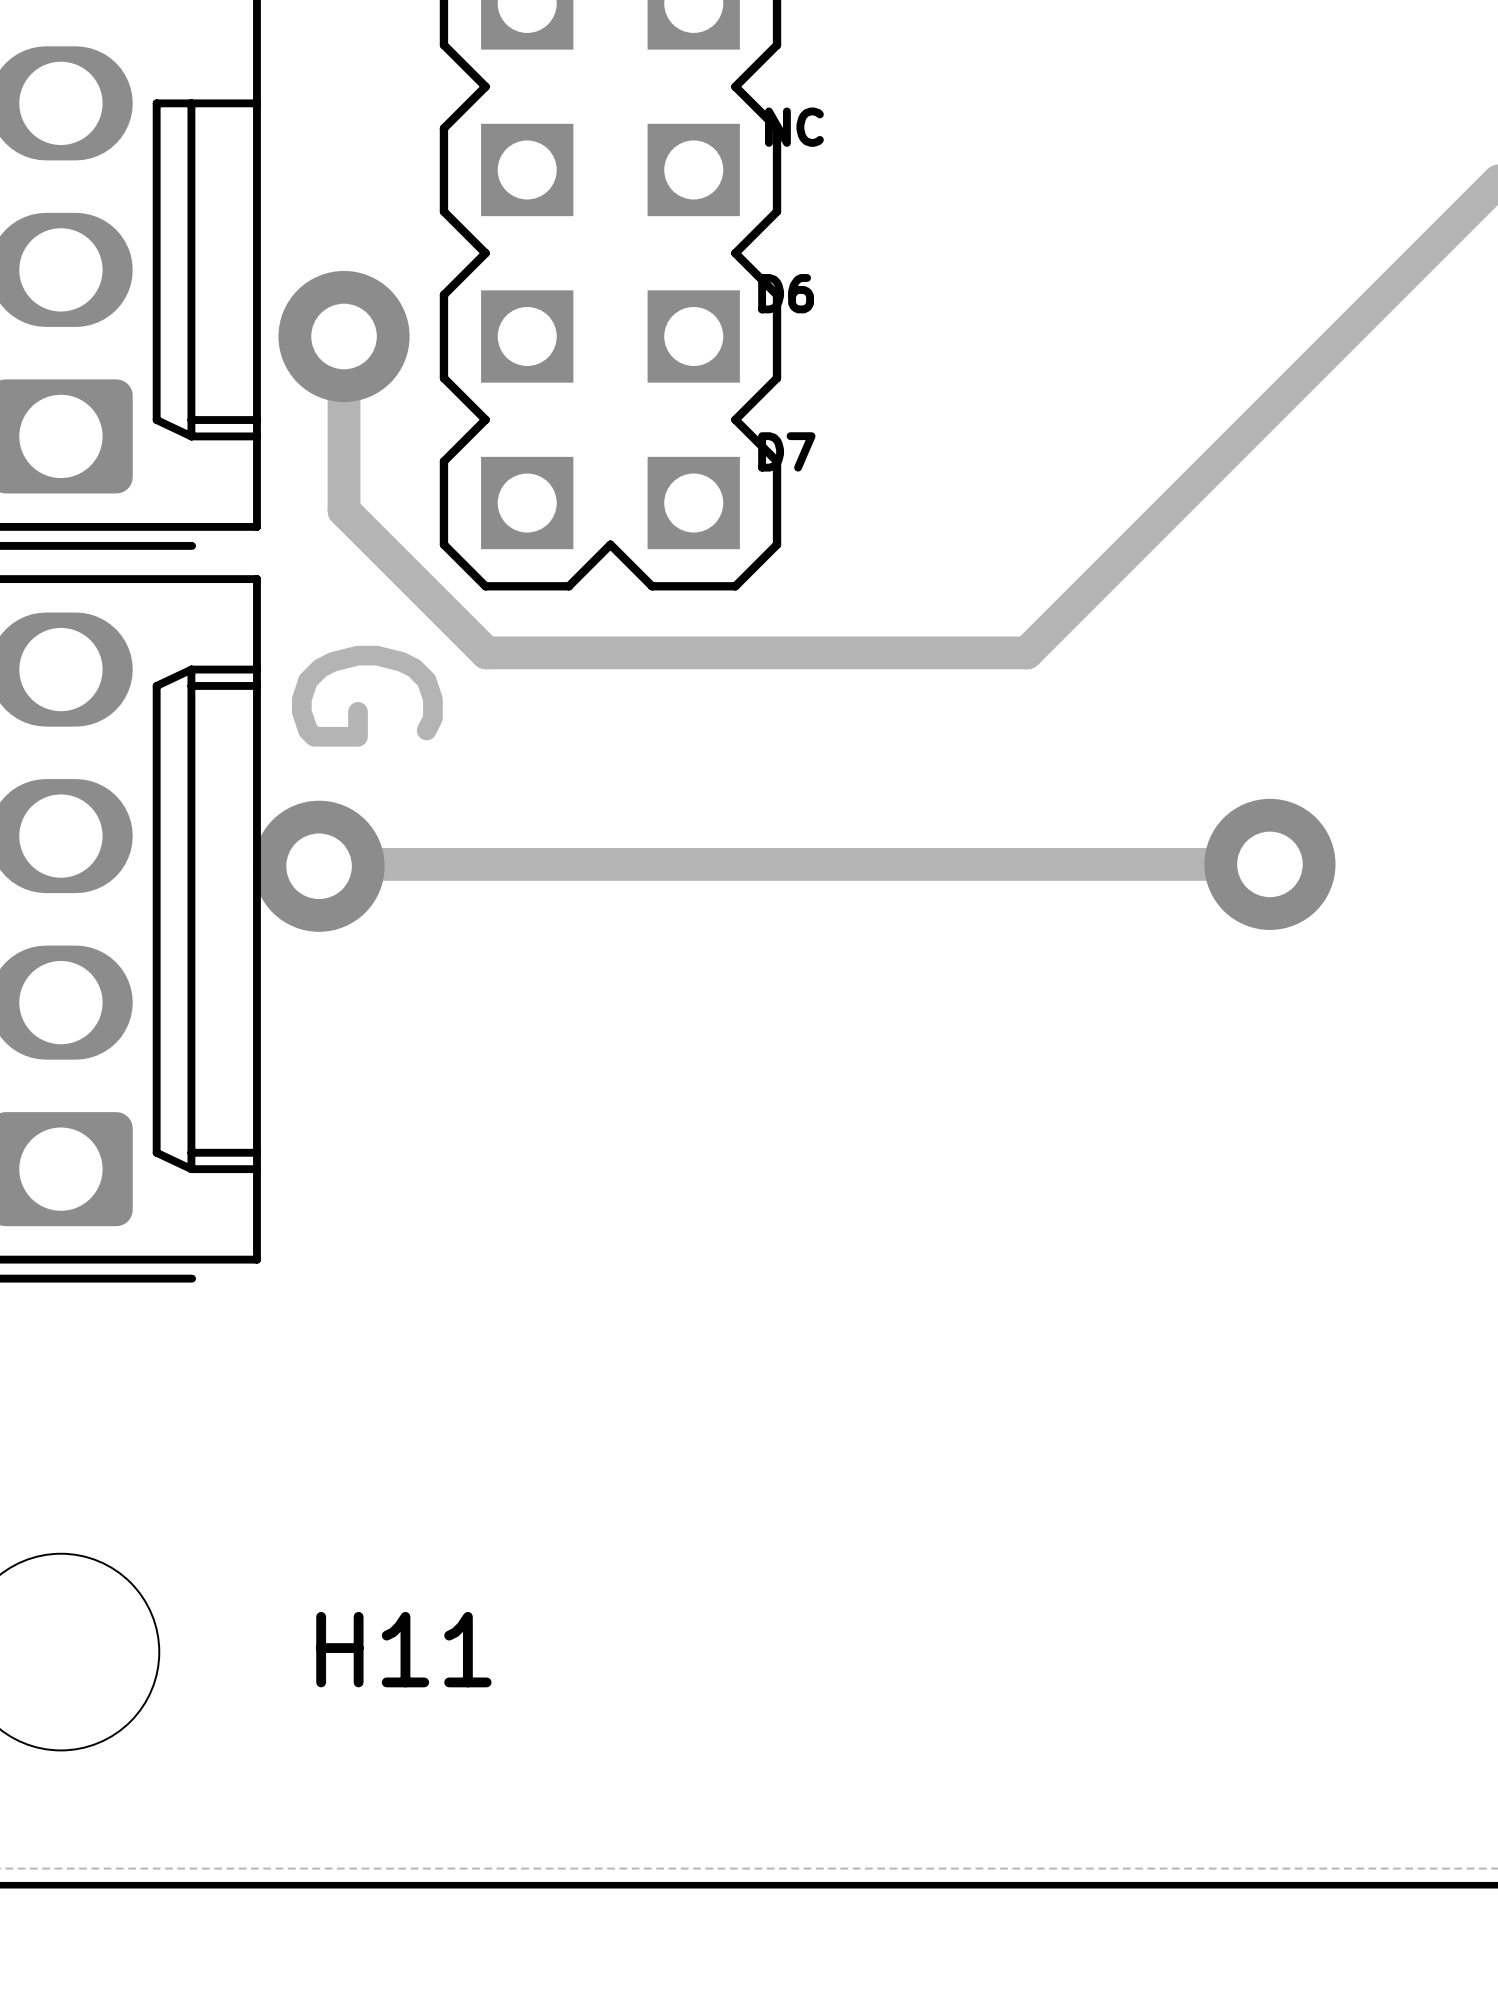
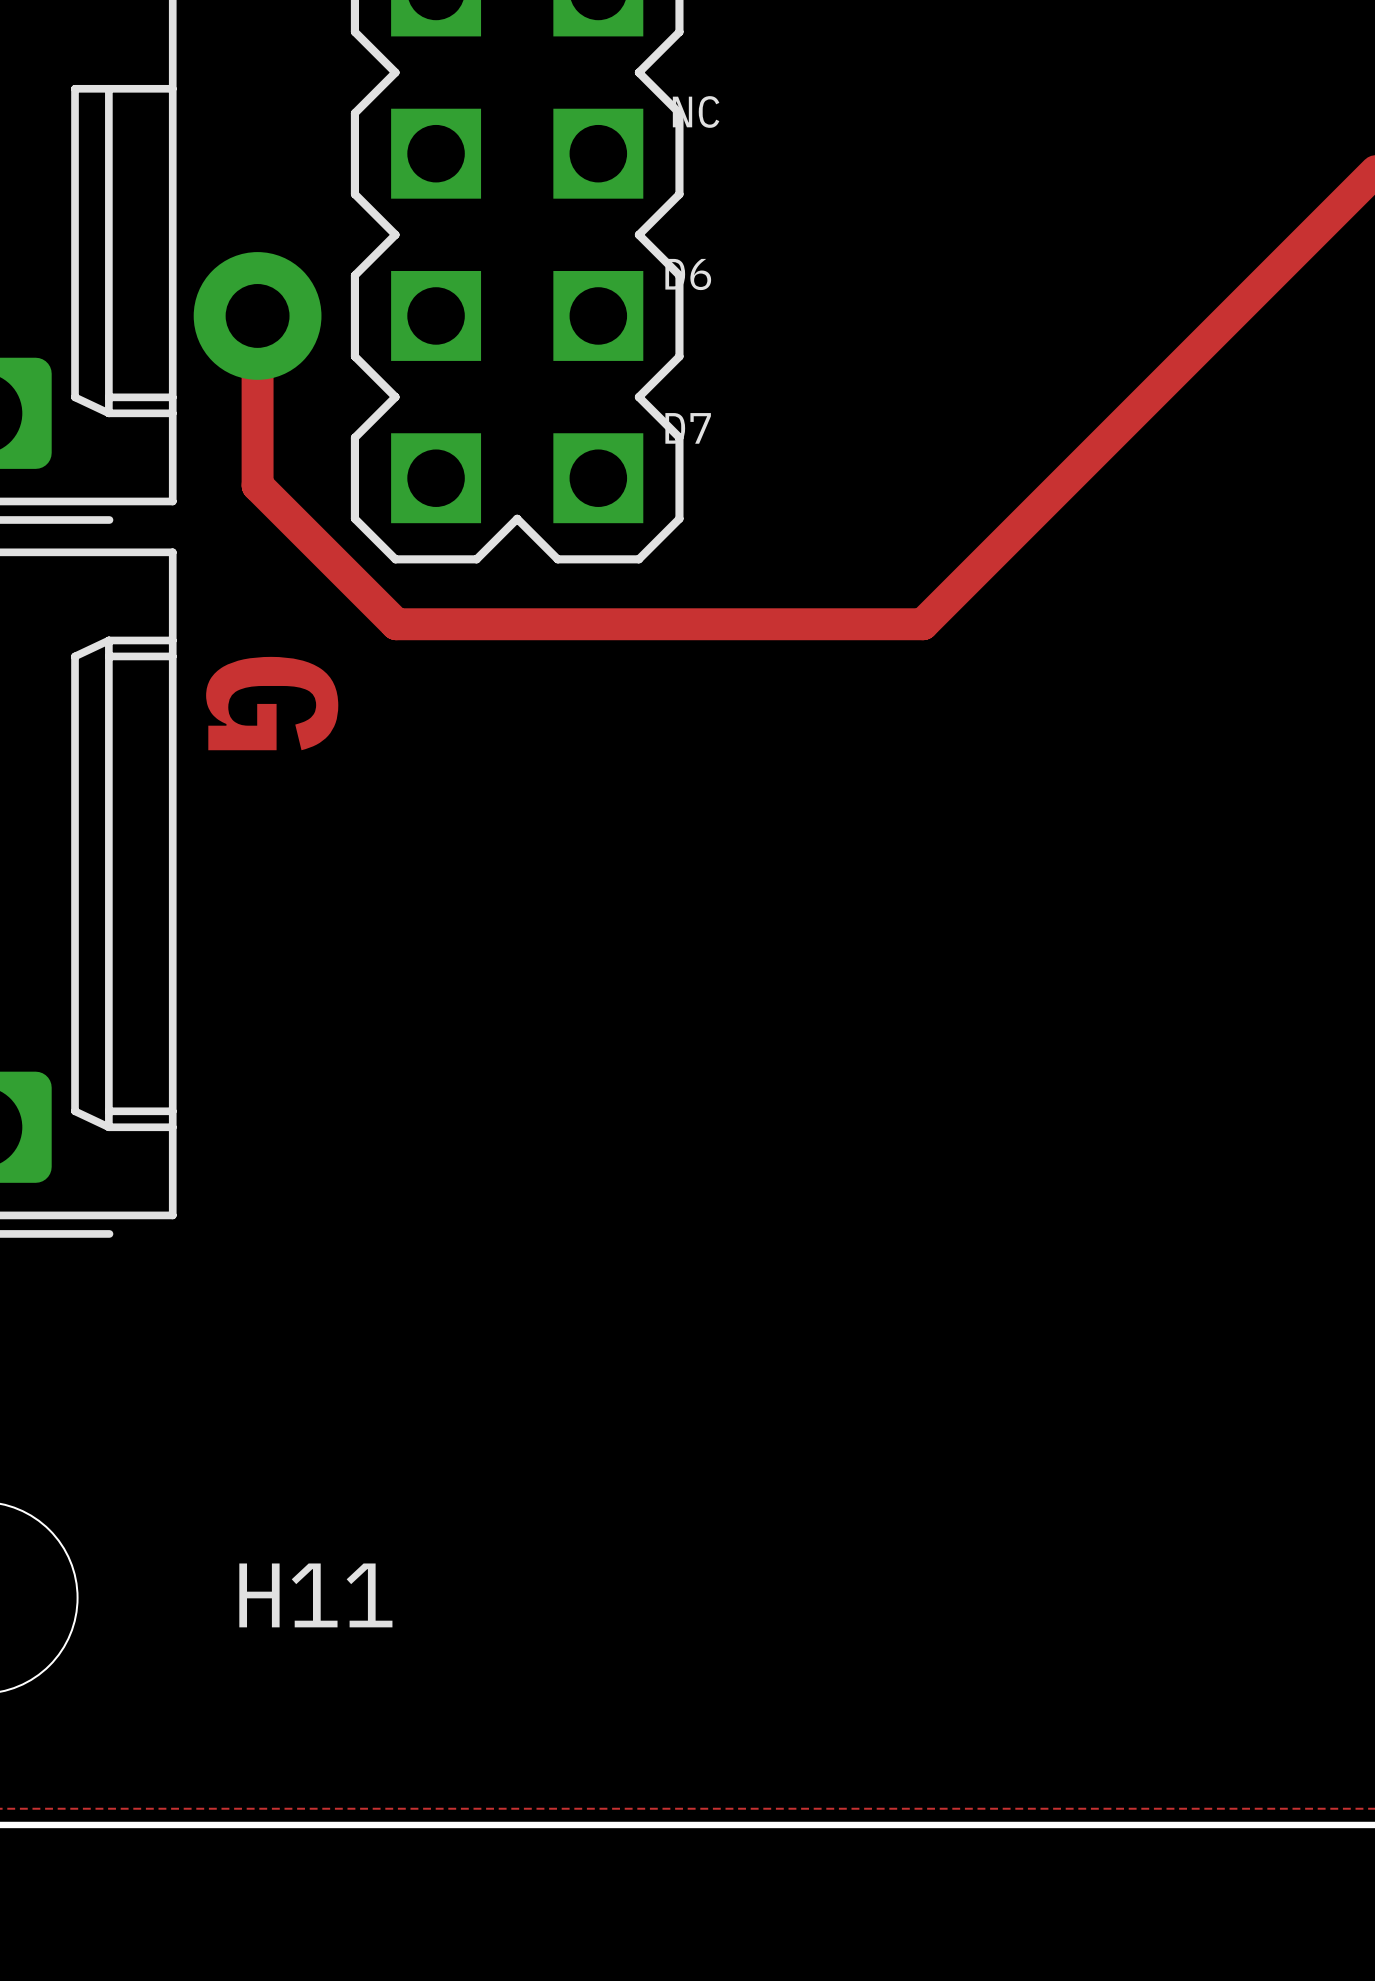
text position: G (367, 696) -> G (272, 703)
track: (1269, 864) (320, 864) (319, 866) -> none
via: (1269, 864) -> none
via: (319, 866) -> none

